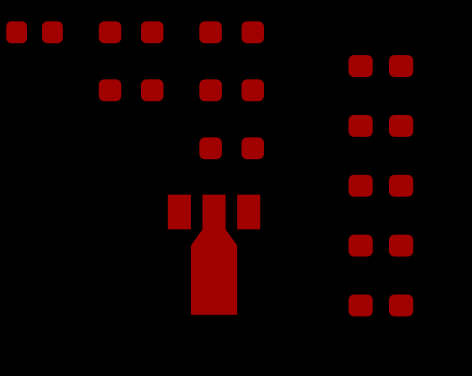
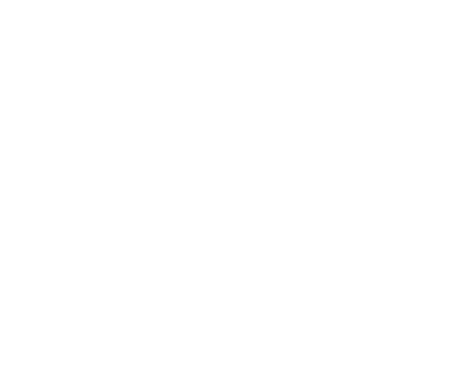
part: (34, 32) -> none
part: (131, 32) -> none
part: (231, 32) -> none
part: (380, 66) -> none
part: (131, 90) -> none
part: (231, 90) -> none
part: (380, 125) -> none
part: (231, 148) -> none
part: (380, 185) -> none
part: (380, 245) -> none
part: (214, 254) -> none
part: (380, 305) -> none

